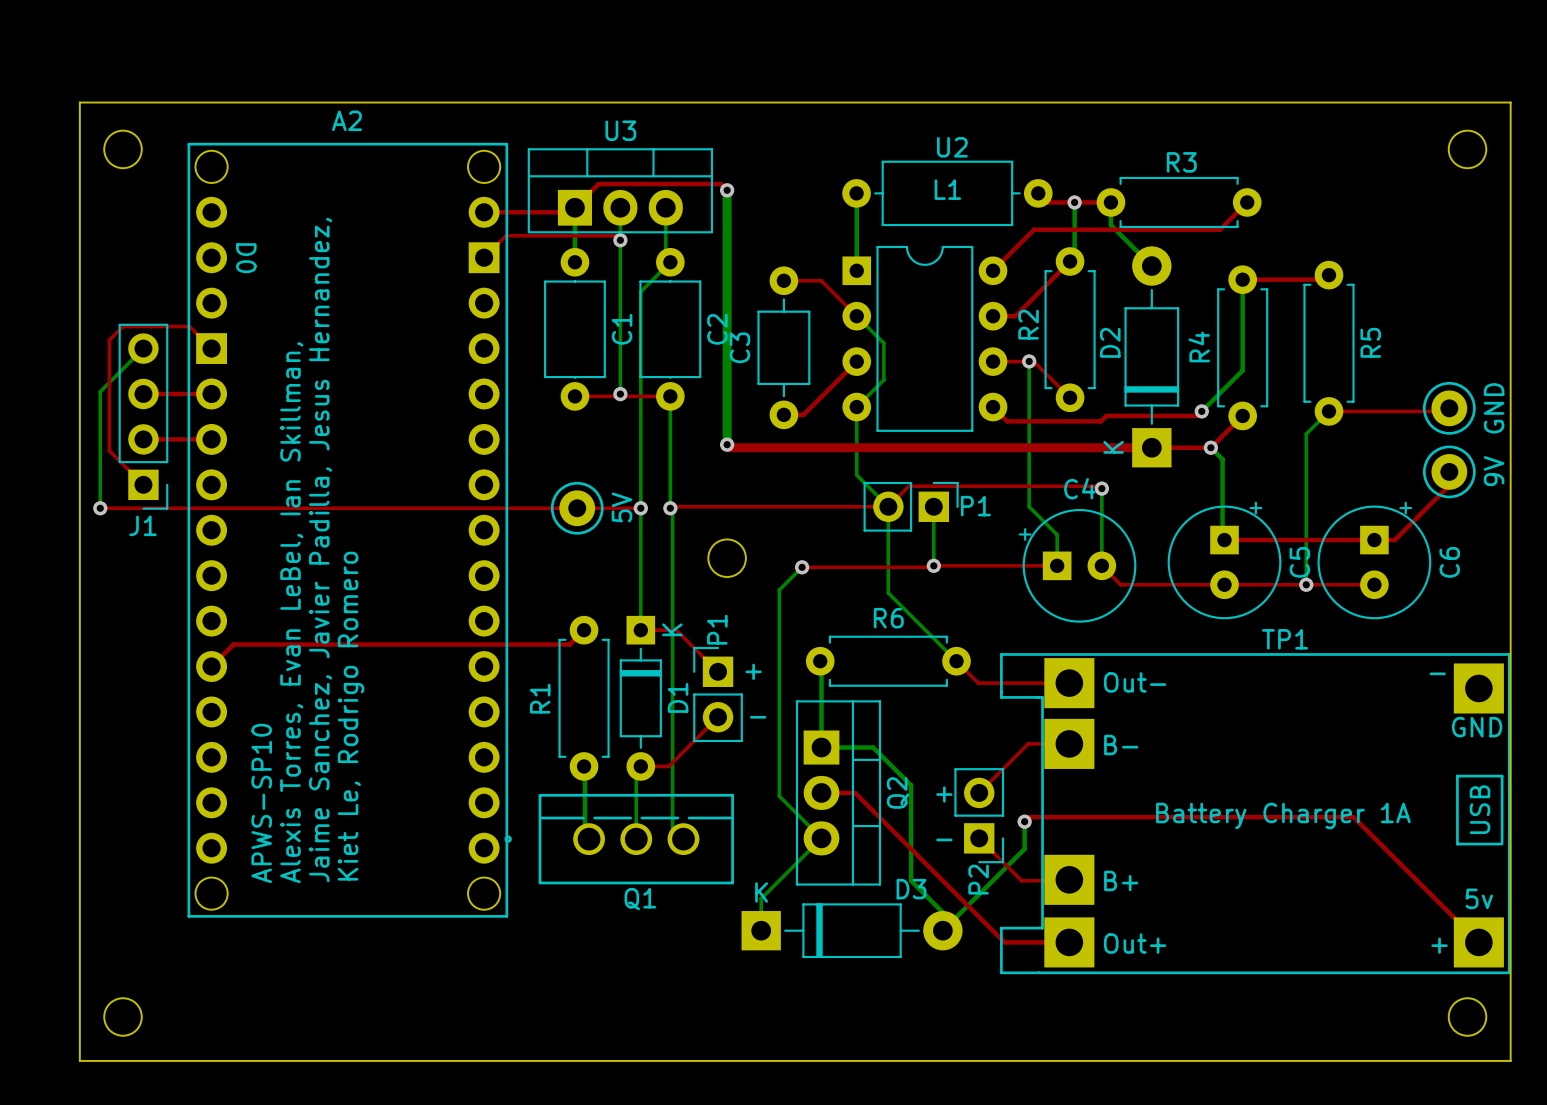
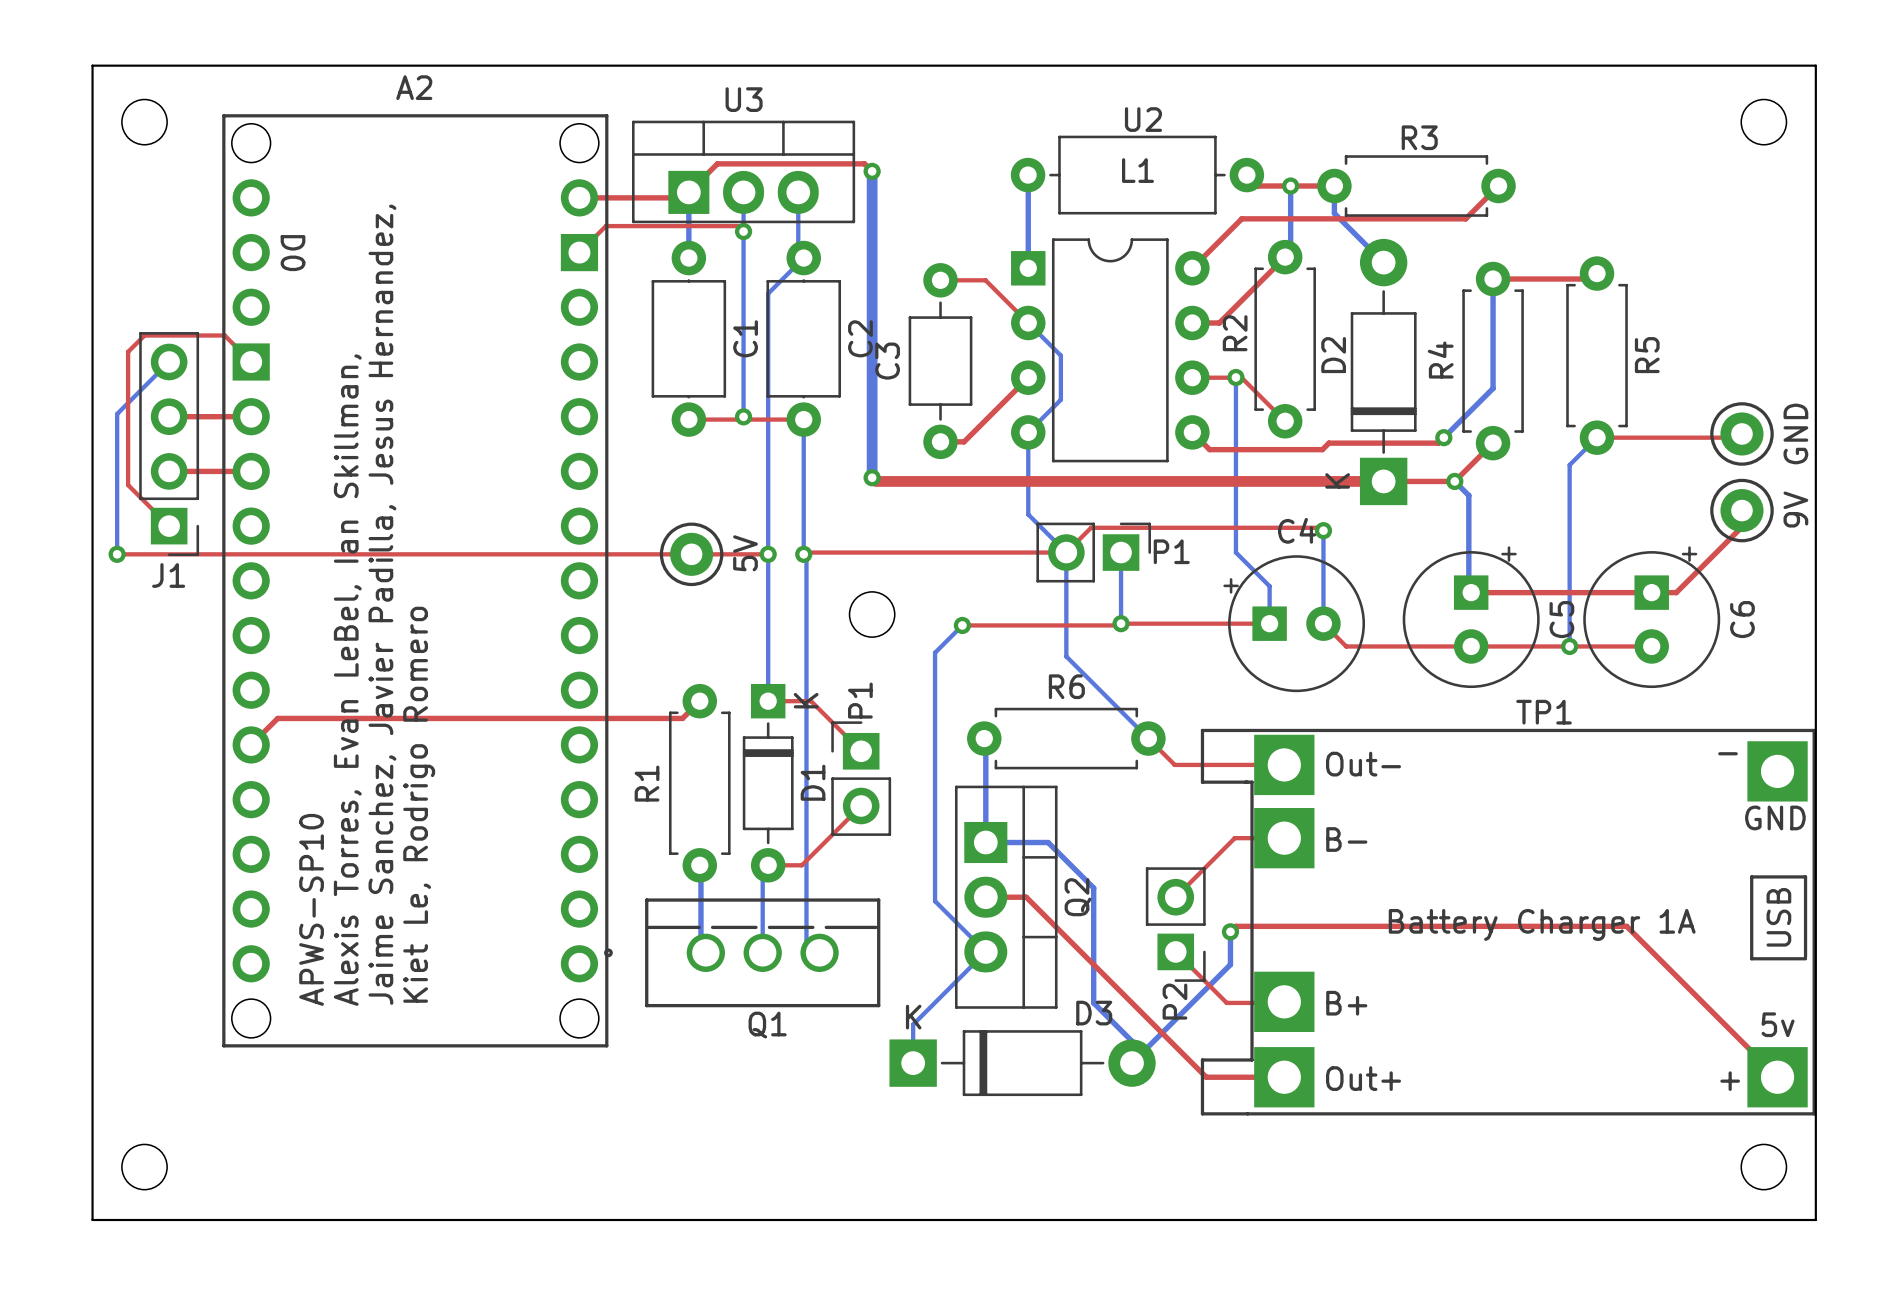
text: + (753, 671) -> none
text: - (758, 717) -> none
text: + (944, 794) -> none
text: - (944, 839) -> none

